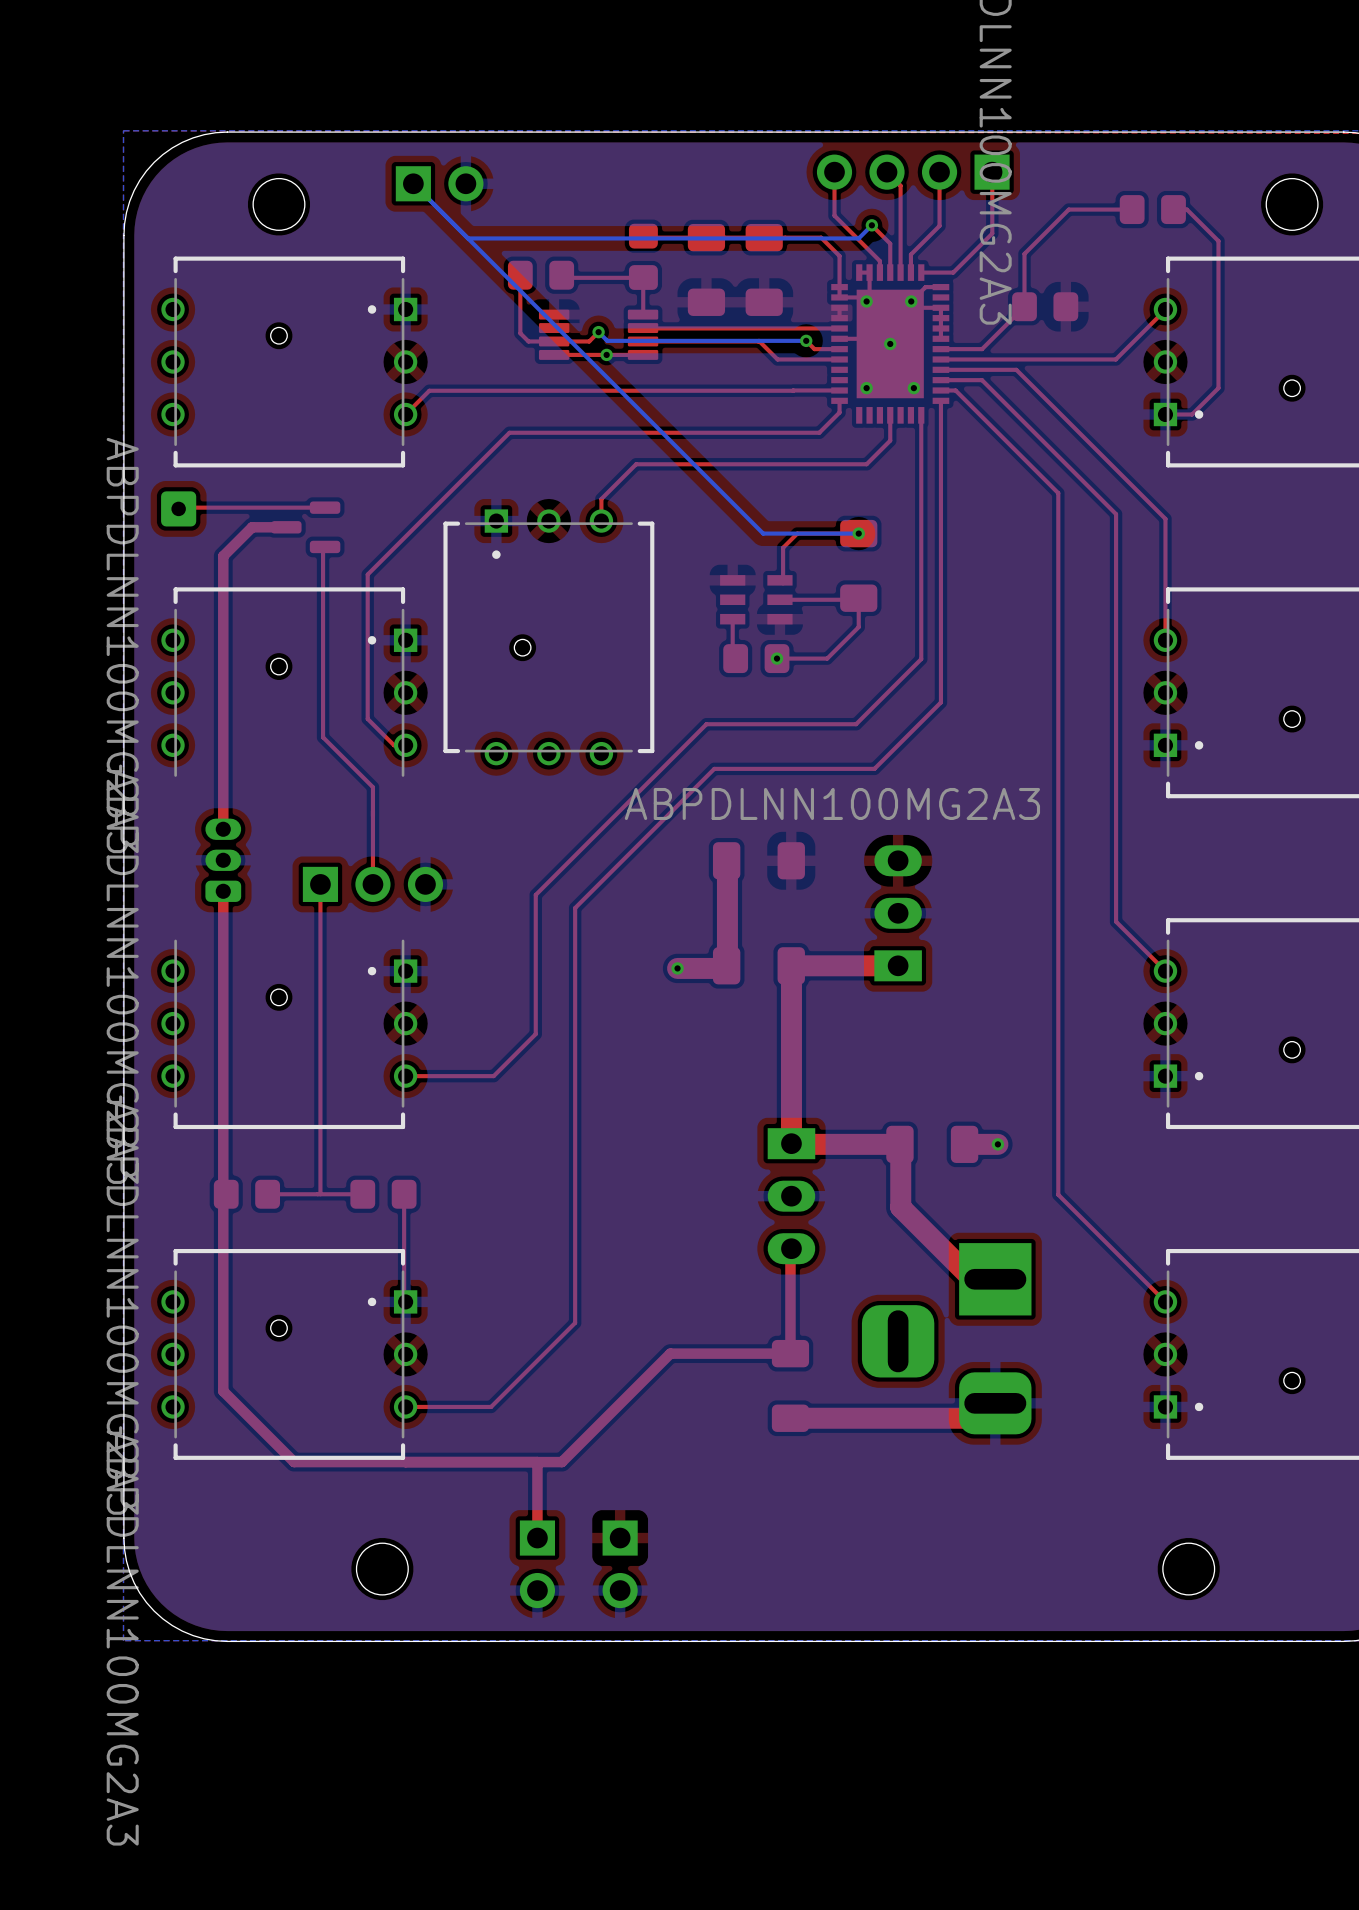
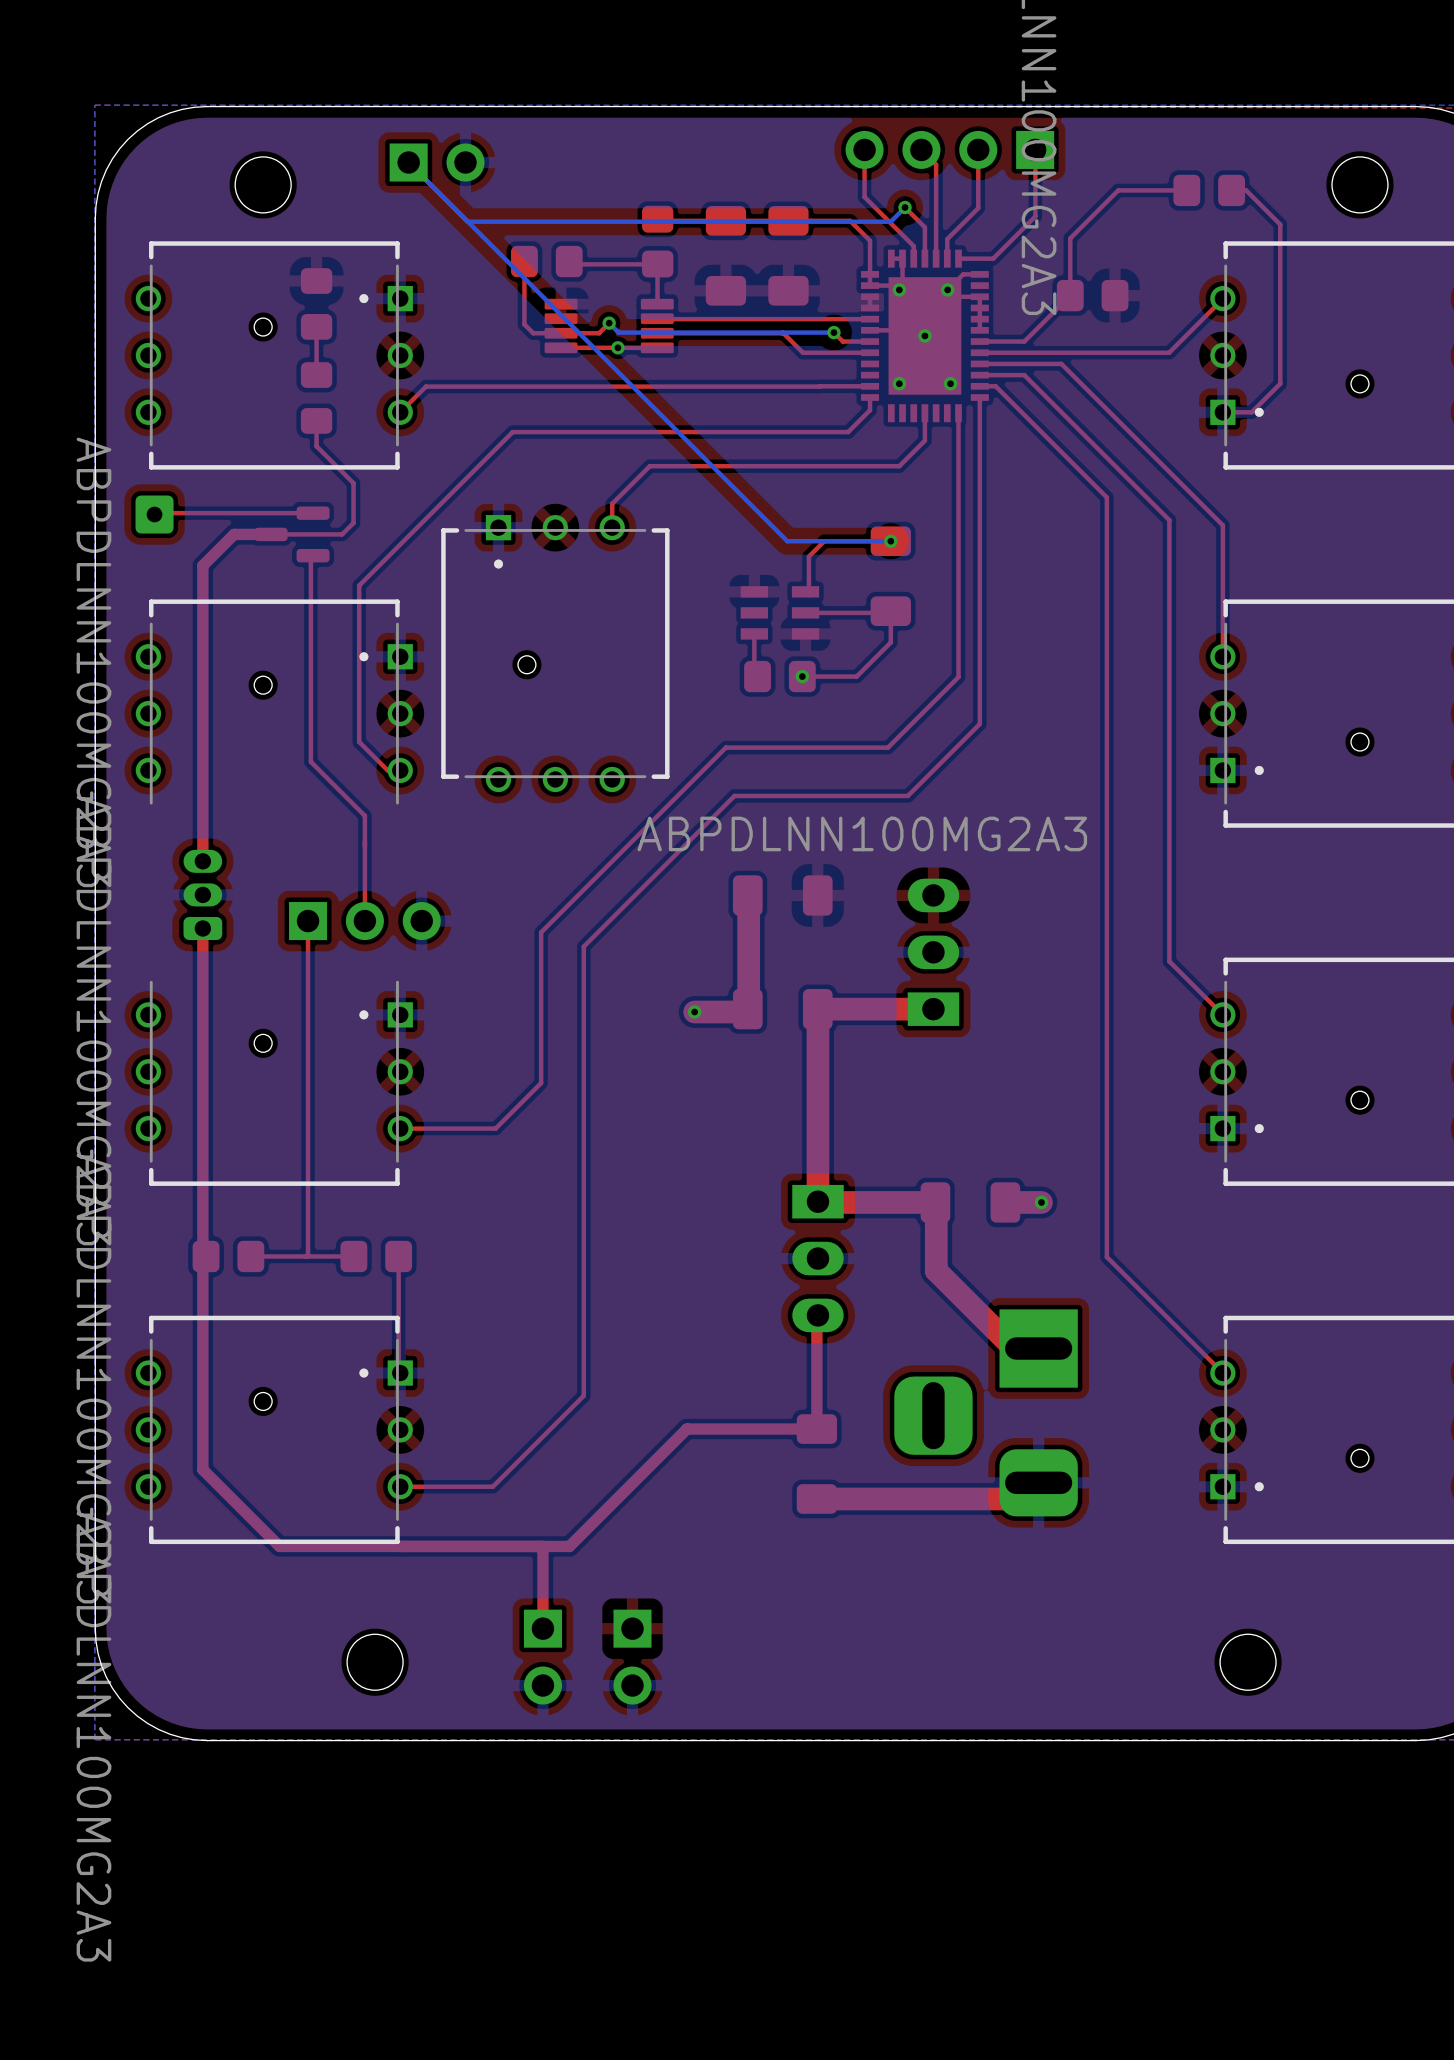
part: none -> (316, 303)
top track: none -> (316, 326) (316, 375)
part: none -> (316, 397)
top track: none -> (316, 420) (316, 446) (353, 483) (353, 523) (342, 534) (271, 534)

